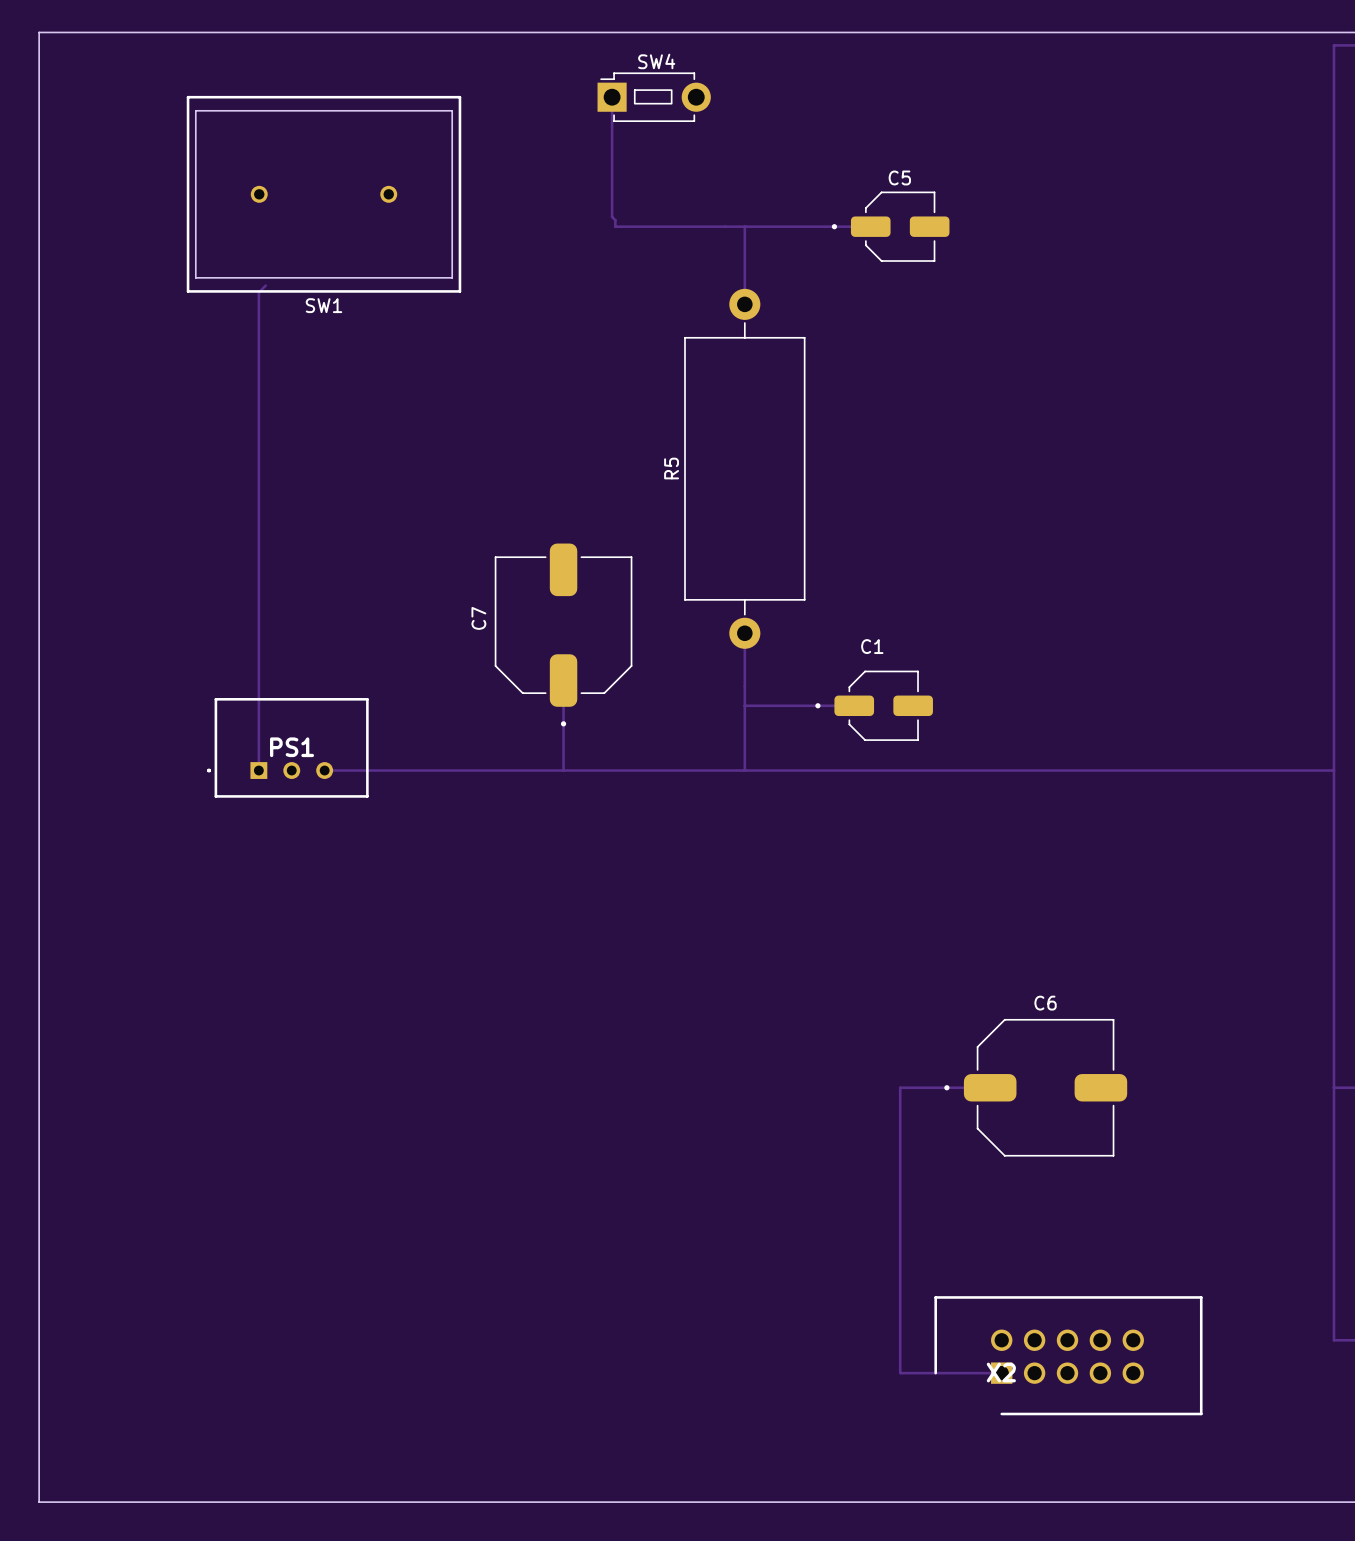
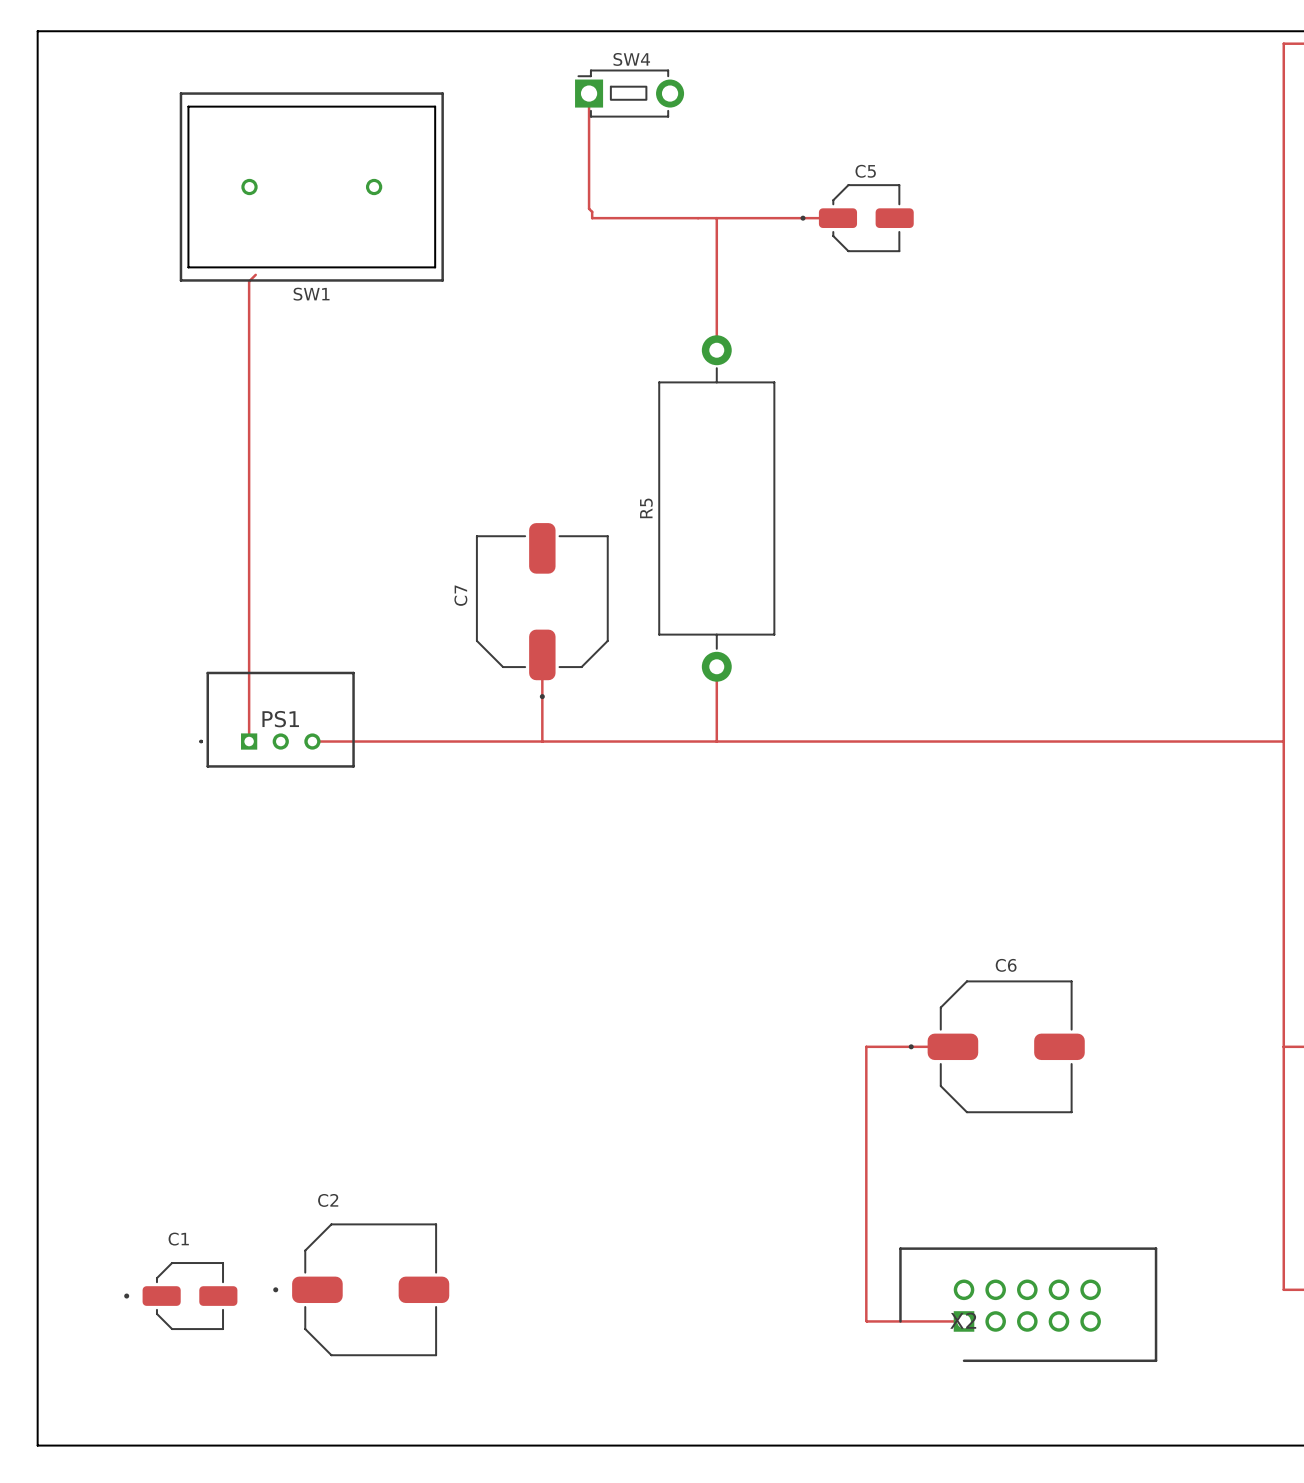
track: none -> (716, 292) (716, 350)
R5 position: (744, 468) -> (716, 508)
track: (744, 633) (744, 692) -> none
track: (744, 705) (854, 705) -> none
C1 position: (874, 705) -> (180, 1296)
C2: none -> (361, 1289)

